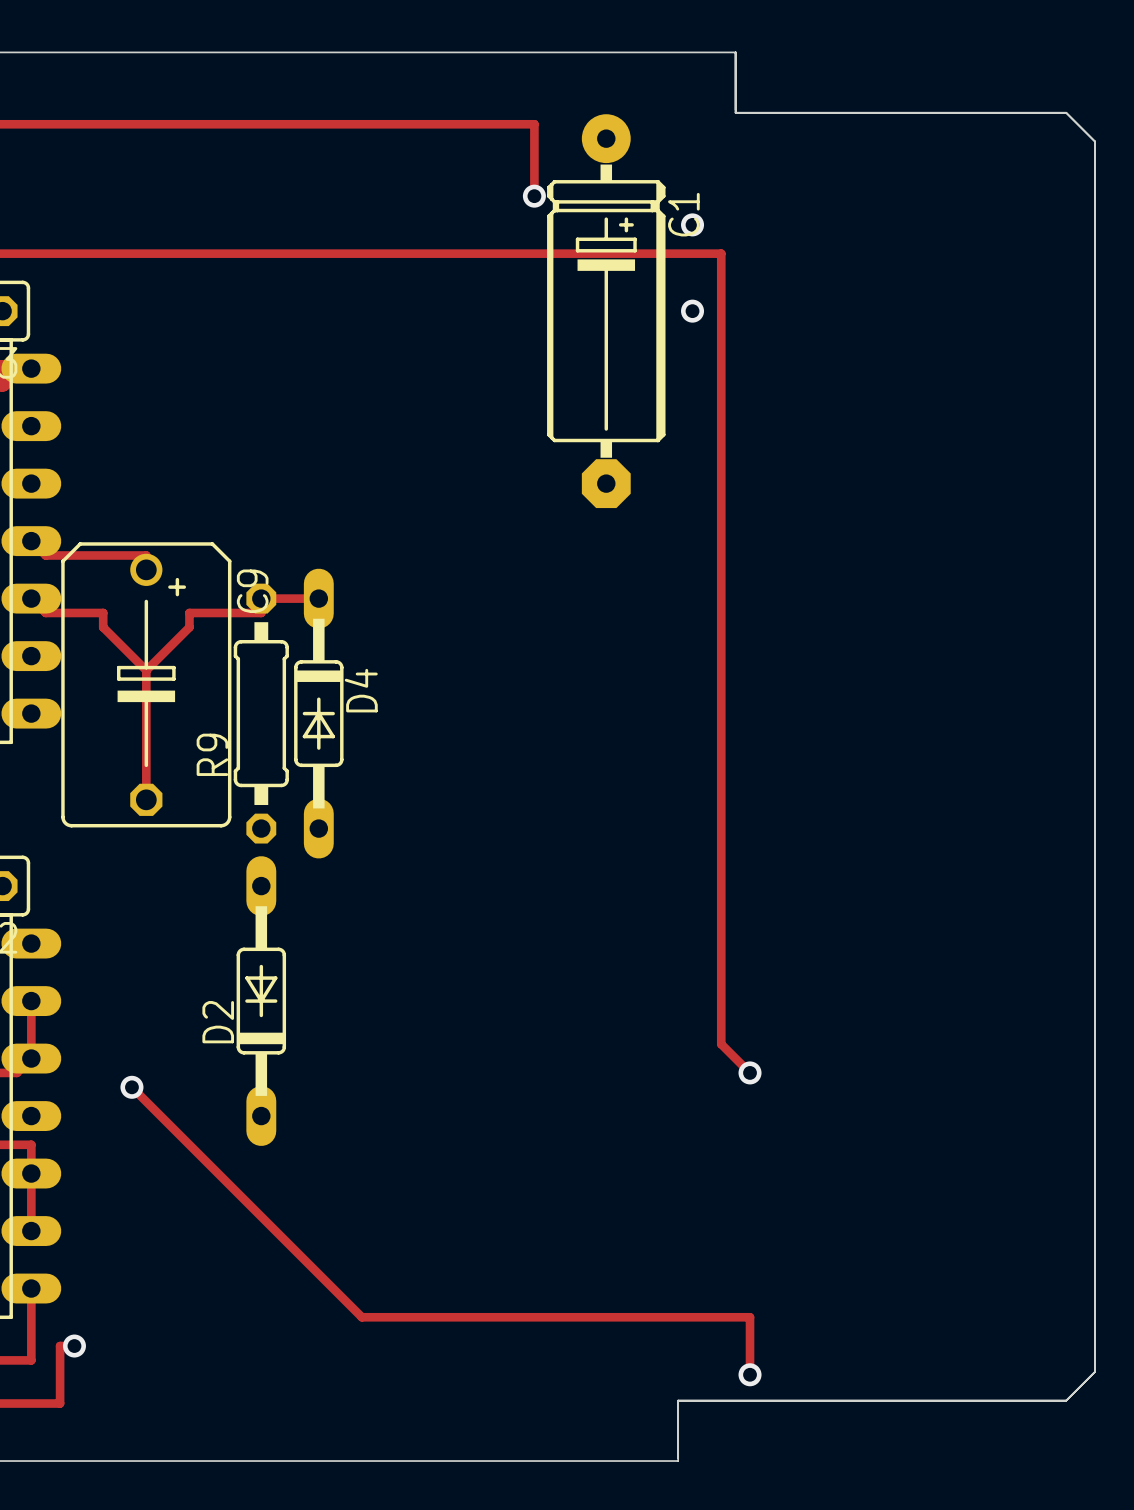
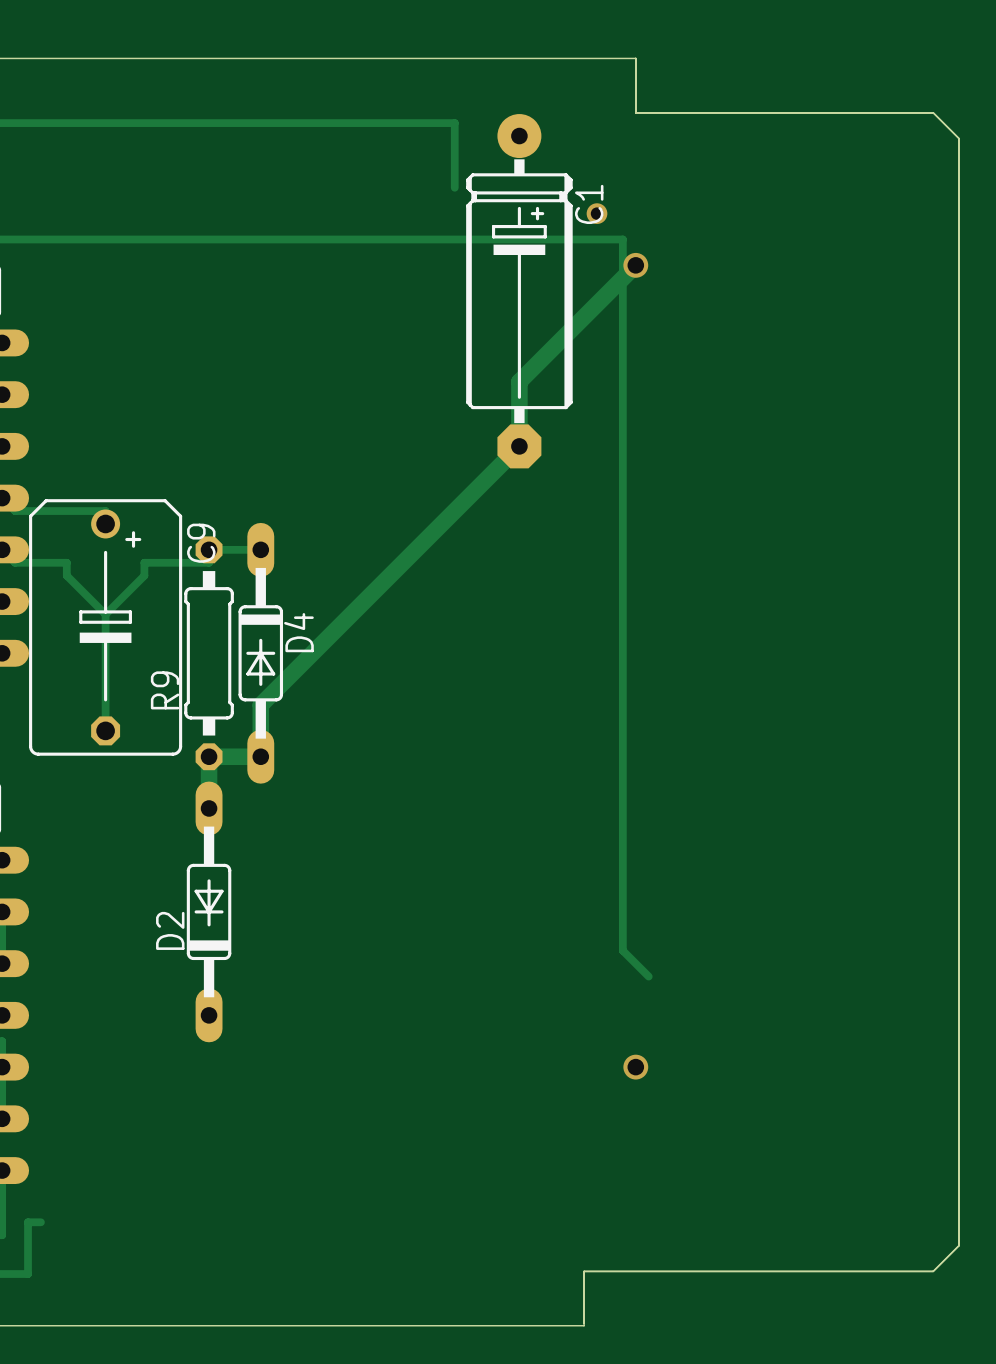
via: (534, 196) -> none
track: none -> (635, 265) (519, 381) (519, 446) (260, 705) (260, 756) (209, 756) (209, 808)
via: none -> (635, 265)
via: (692, 311) -> none
via: (750, 1072) -> none
track: (131, 1087) (361, 1317) (750, 1317) (750, 1374) -> none
via: (131, 1087) -> none
via: none -> (635, 1067)
via: (74, 1346) -> none
via: (750, 1374) -> none

